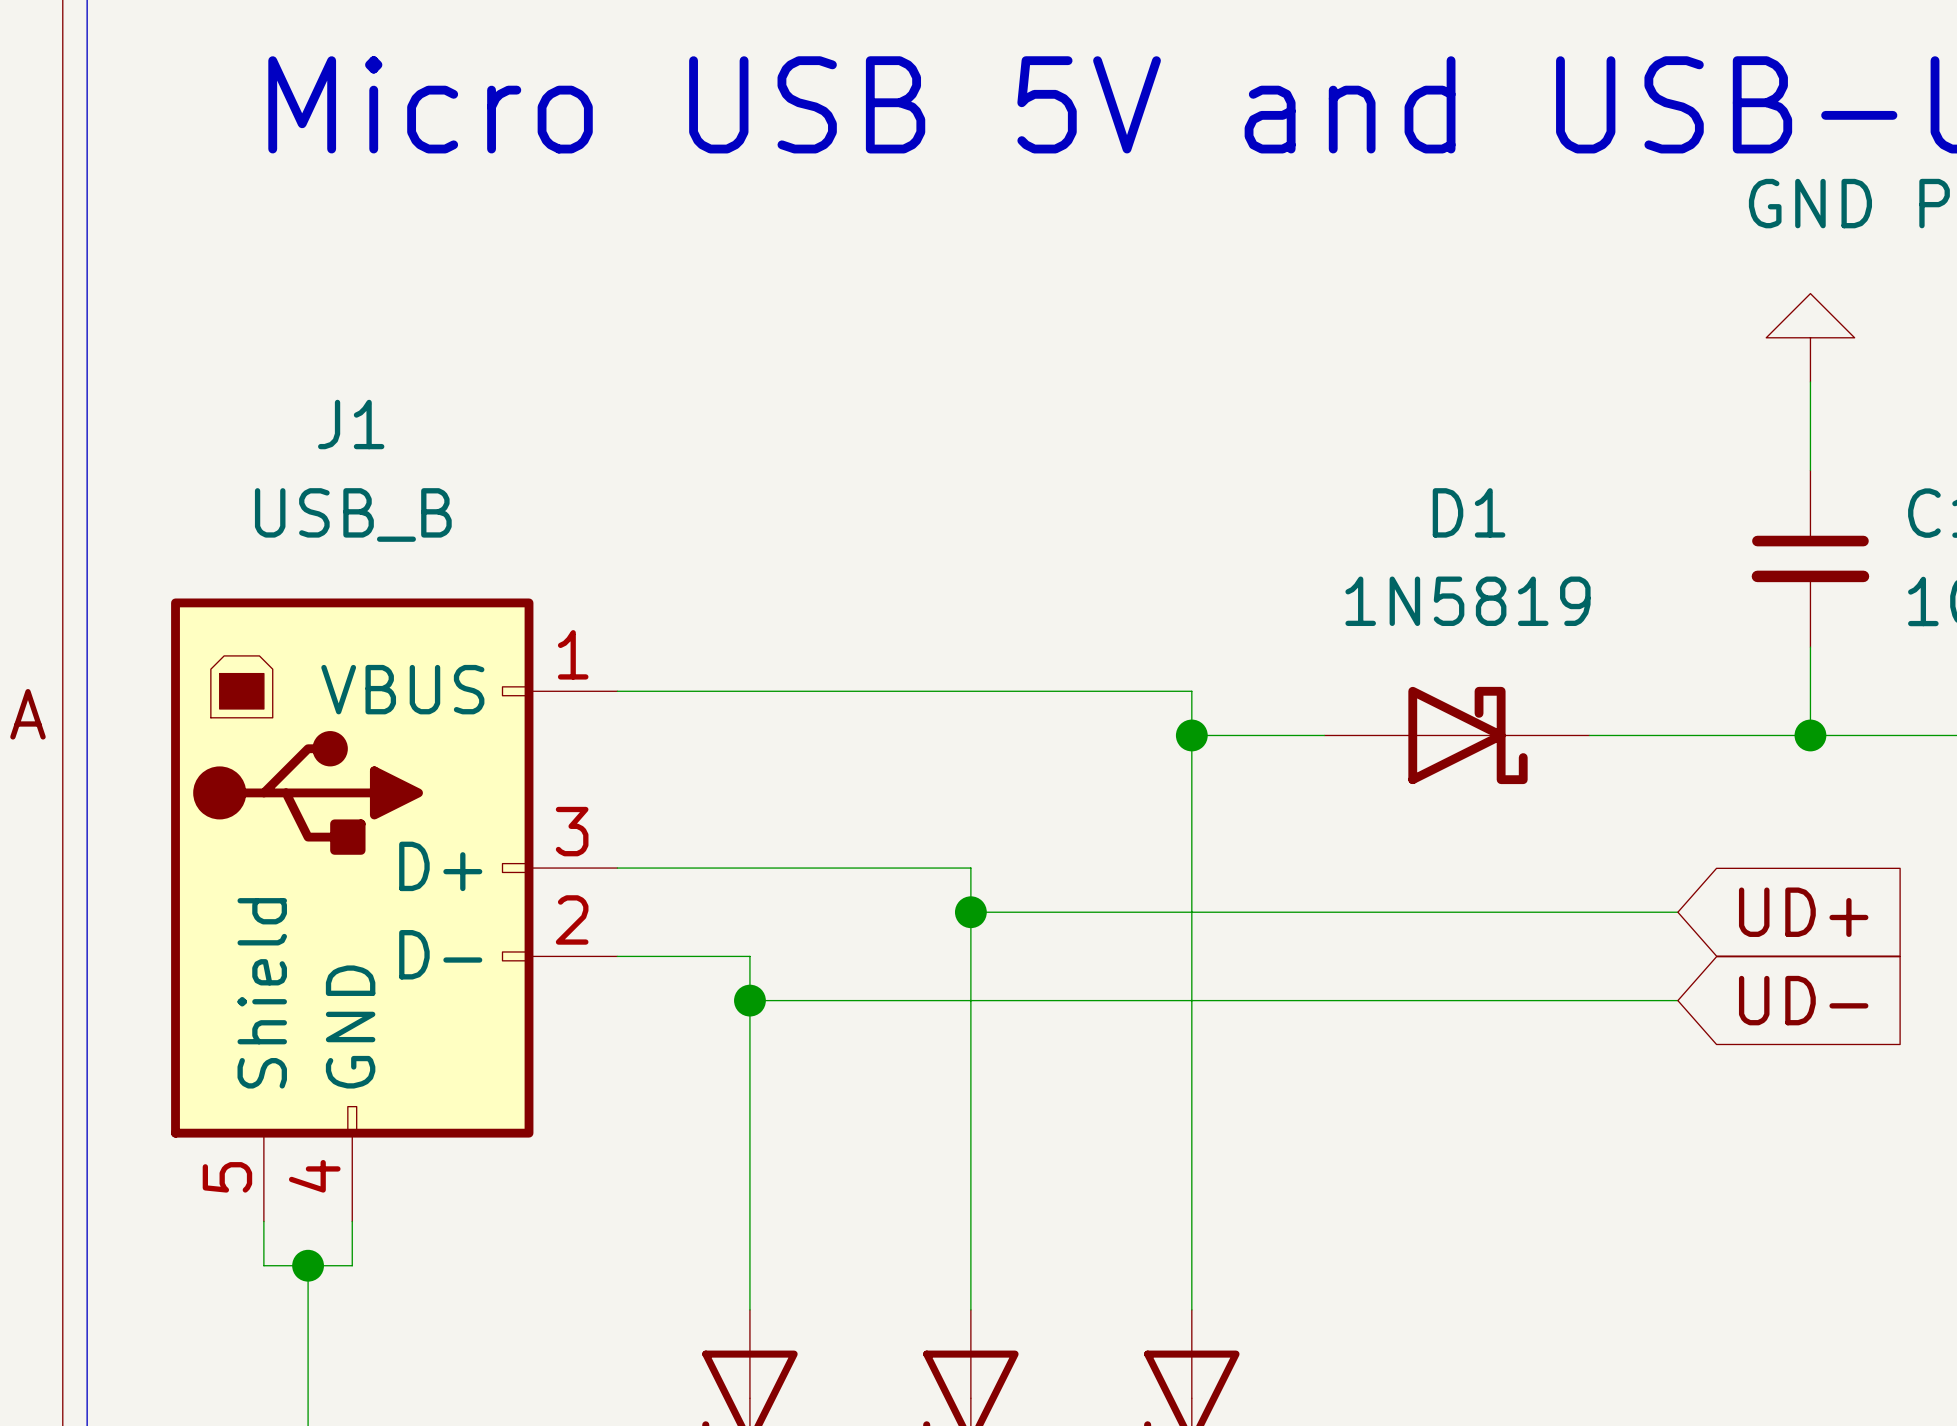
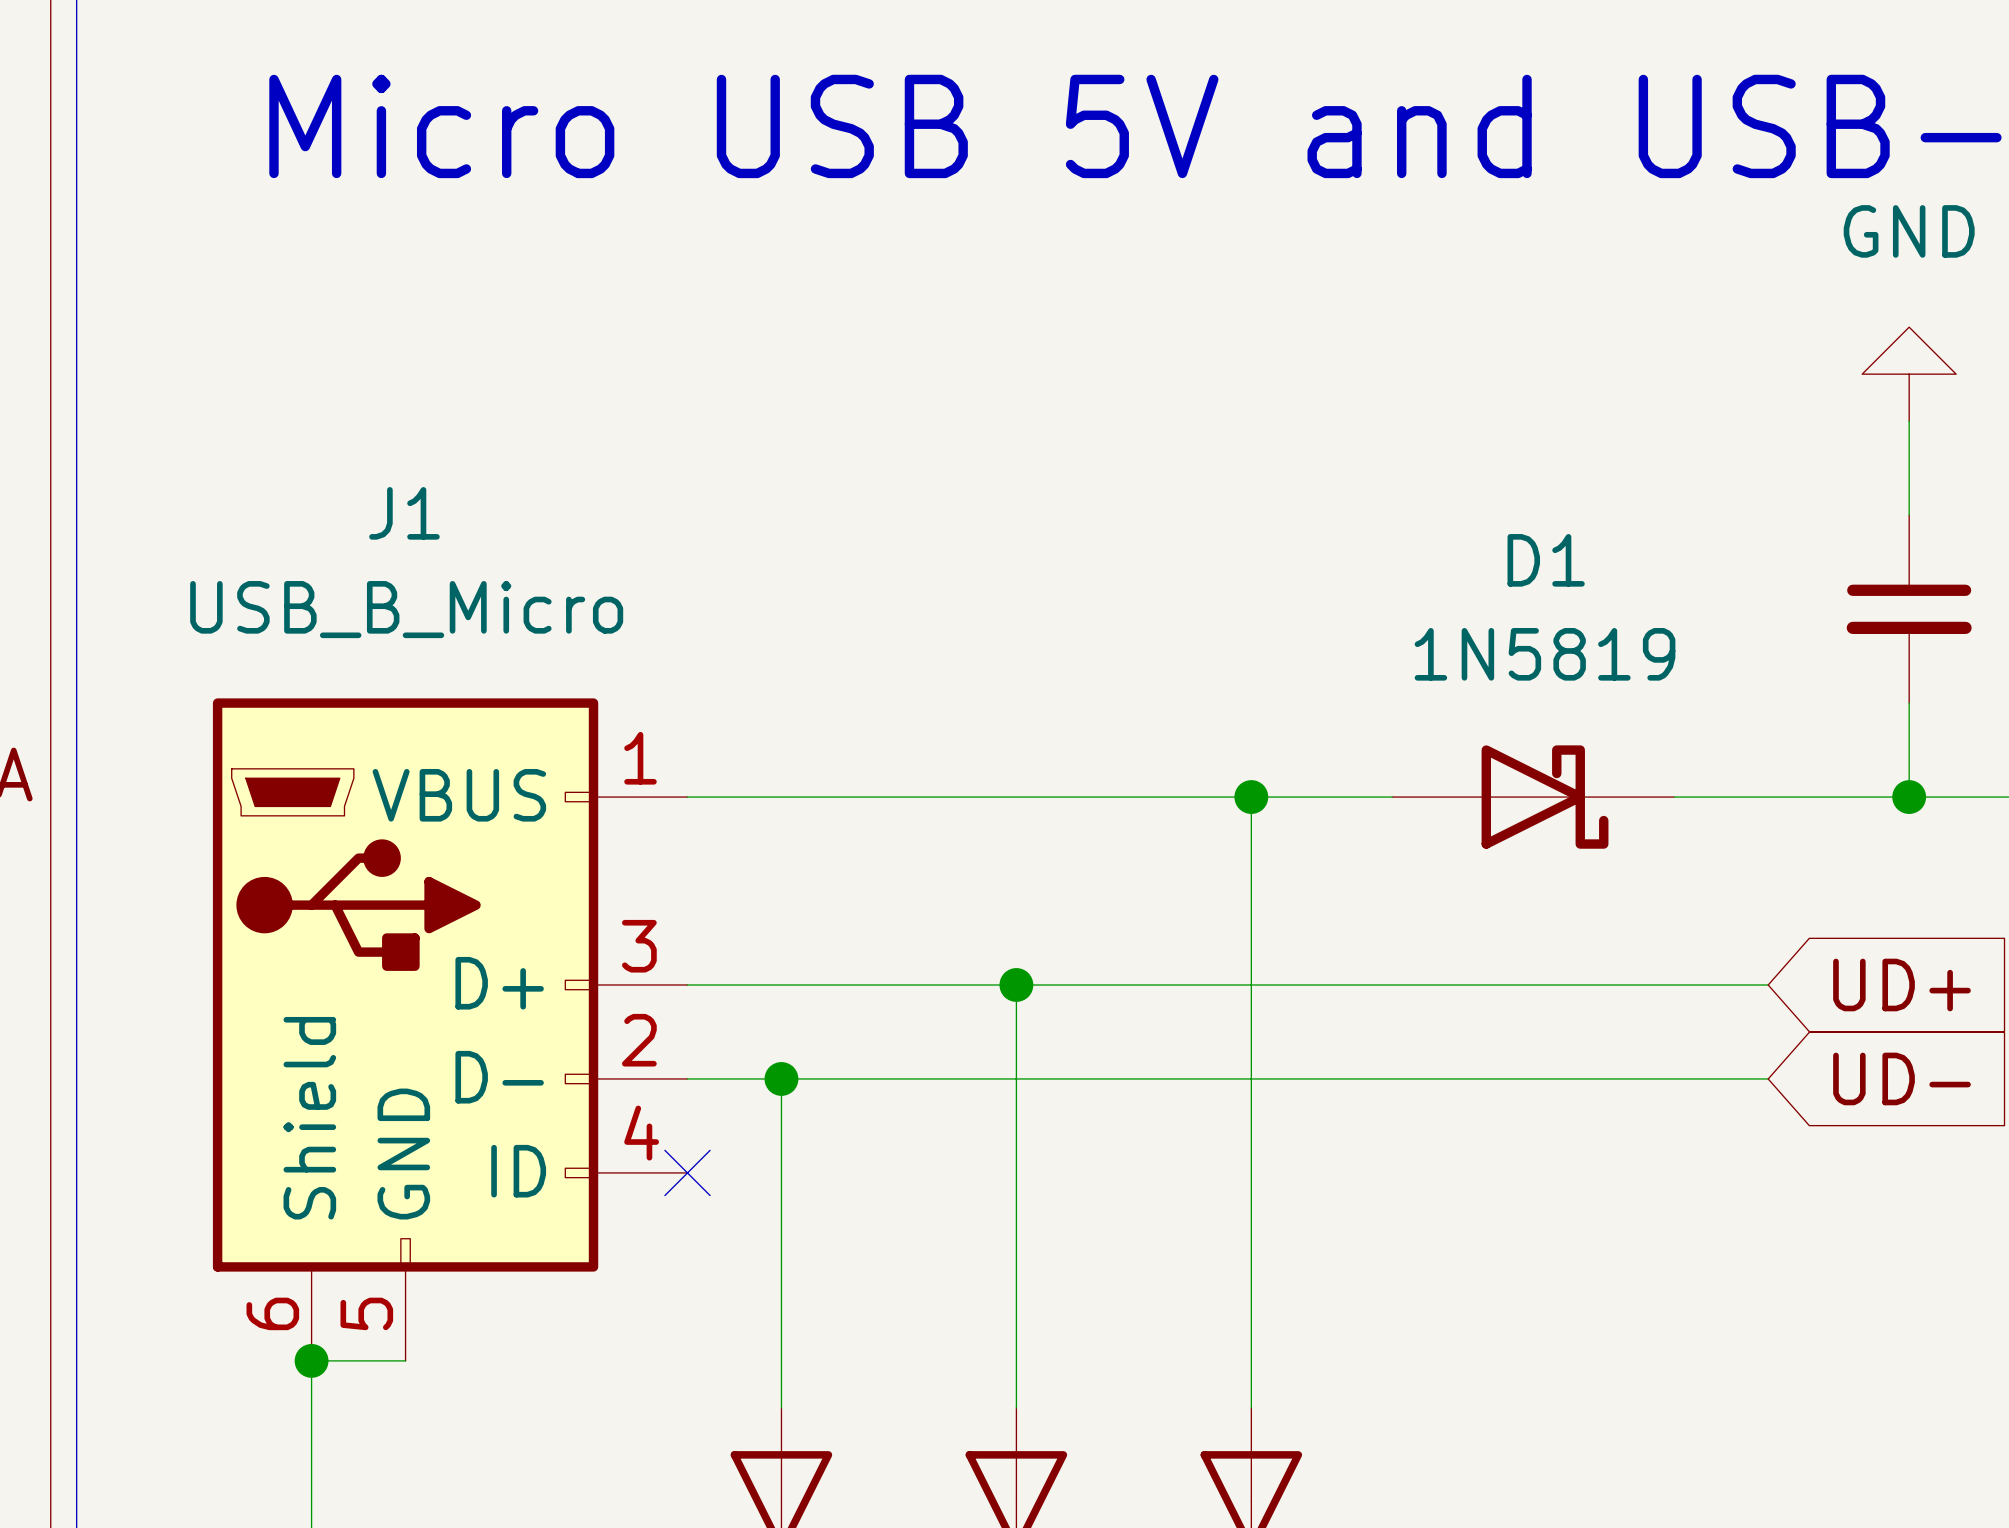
J1 value: USB_B (353, 514) -> USB_B_Micro (406, 609)
J1 symbol: [171, 598, 618, 1222] -> [212, 698, 688, 1361]
wire: (617, 691) (1191, 691) (1191, 735) -> (687, 797) (1251, 797)
wire: (617, 868) (970, 868) (970, 912) -> (687, 984) (1016, 984)
wire: (617, 956) (749, 956) (749, 1000) -> (687, 1078) (781, 1078)
no-connect mark: none -> (687, 1172)
wire: (263, 1221) (263, 1265) (308, 1265) -> none
wire: (352, 1221) (352, 1265) -> (405, 1360) (358, 1360)

